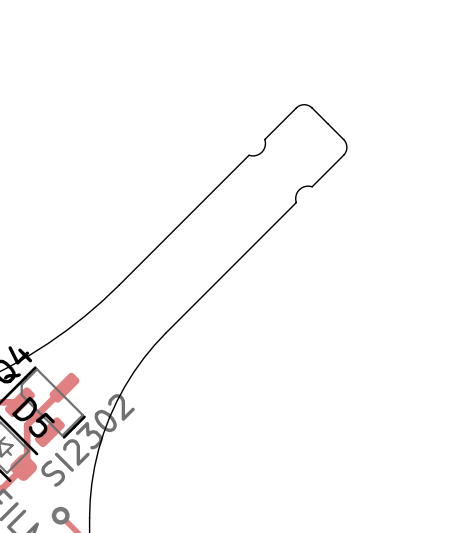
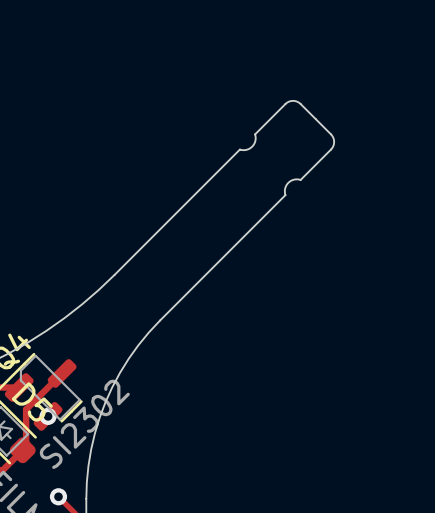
via: none -> (48, 416)

